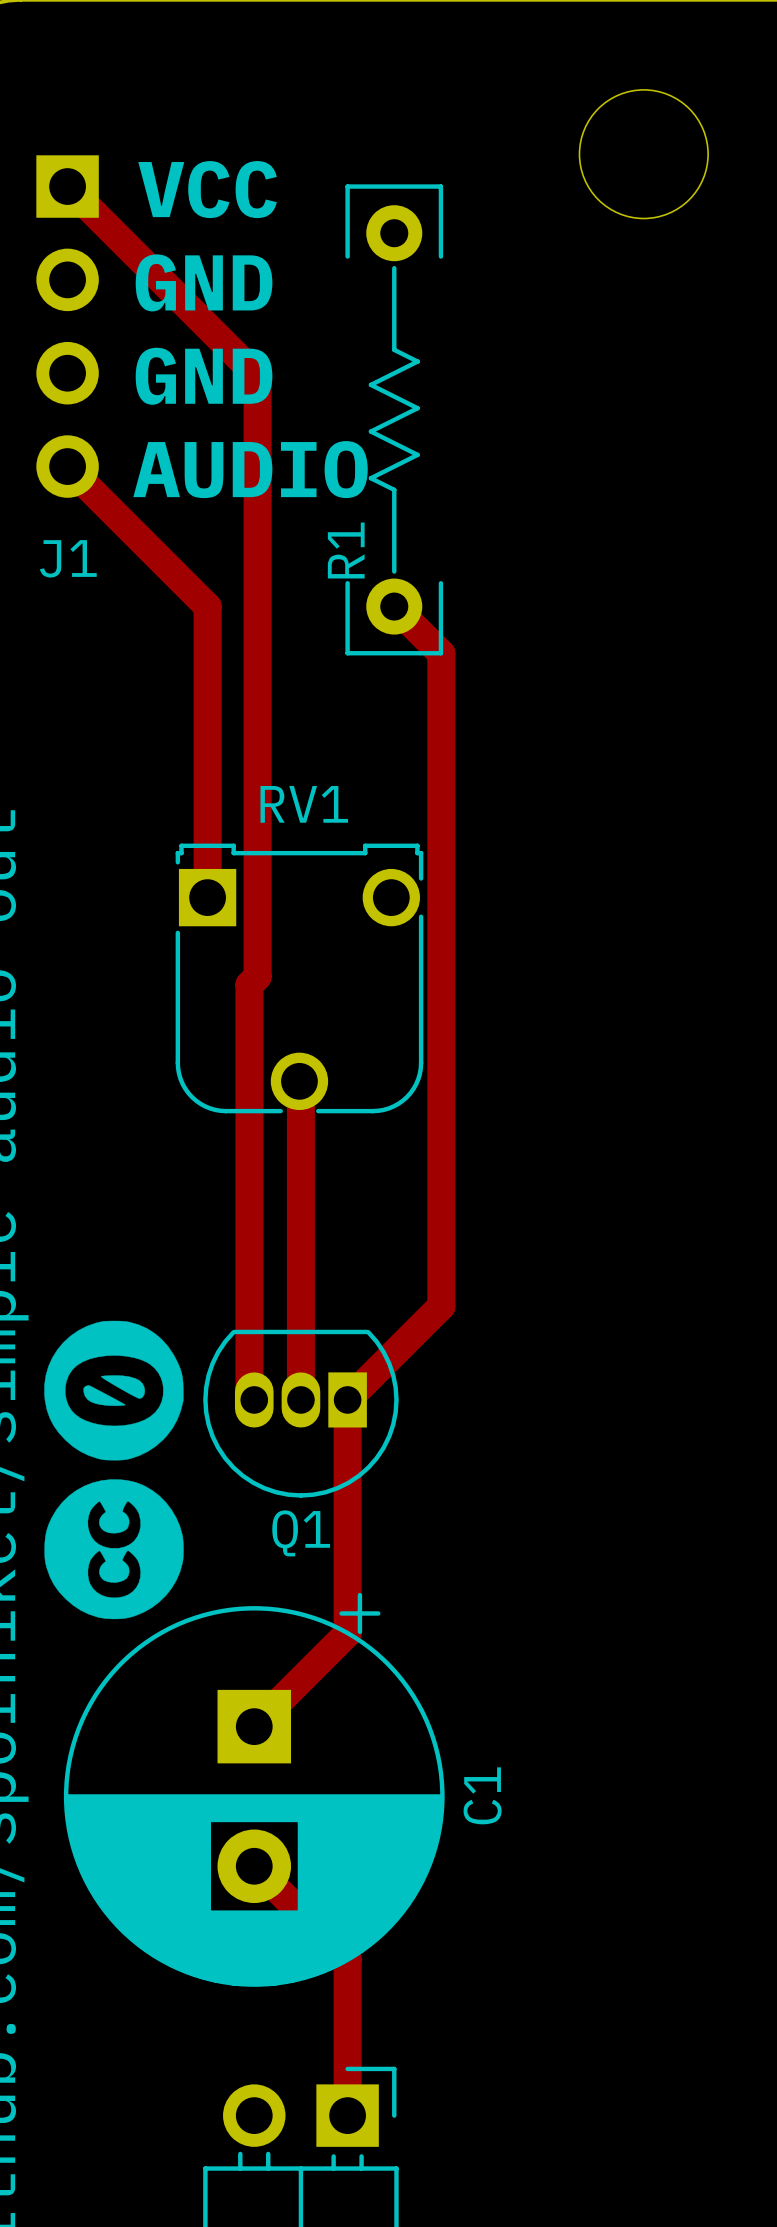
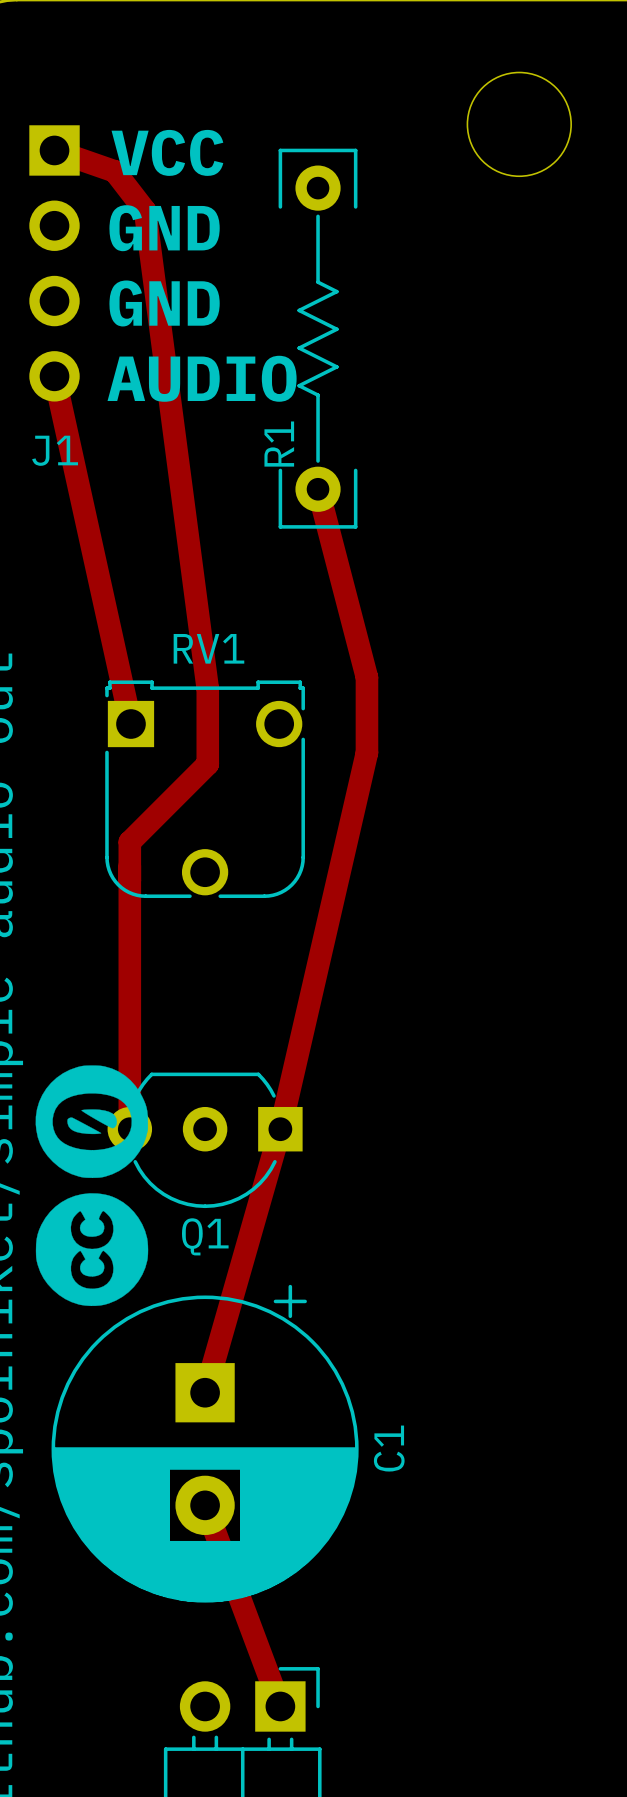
top track: (67, 186) (257, 376) (257, 853) -> (54, 150) (114, 171) (145, 210) (207, 688)
top track: (67, 466) (207, 606) (207, 897) -> (54, 376) (130, 724)
top track: (394, 606) (441, 653) (441, 1306) (347, 1399) (347, 1633) (254, 1726) -> (318, 489) (366, 677) (366, 752) (280, 1129) (205, 1392)
top track: (257, 947) (257, 976) (249, 984) (249, 1395) -> (207, 764) (129, 842) (129, 1129)
RV1 position: (299, 978) -> (205, 789)
top track: (299, 1081) (300, 1399) -> none
Q1 footprint: [203, 1329, 399, 1498] -> [107, 1072, 303, 1209]
top track: (254, 1866) (347, 1959) (347, 2115) -> (205, 1505) (280, 1706)

